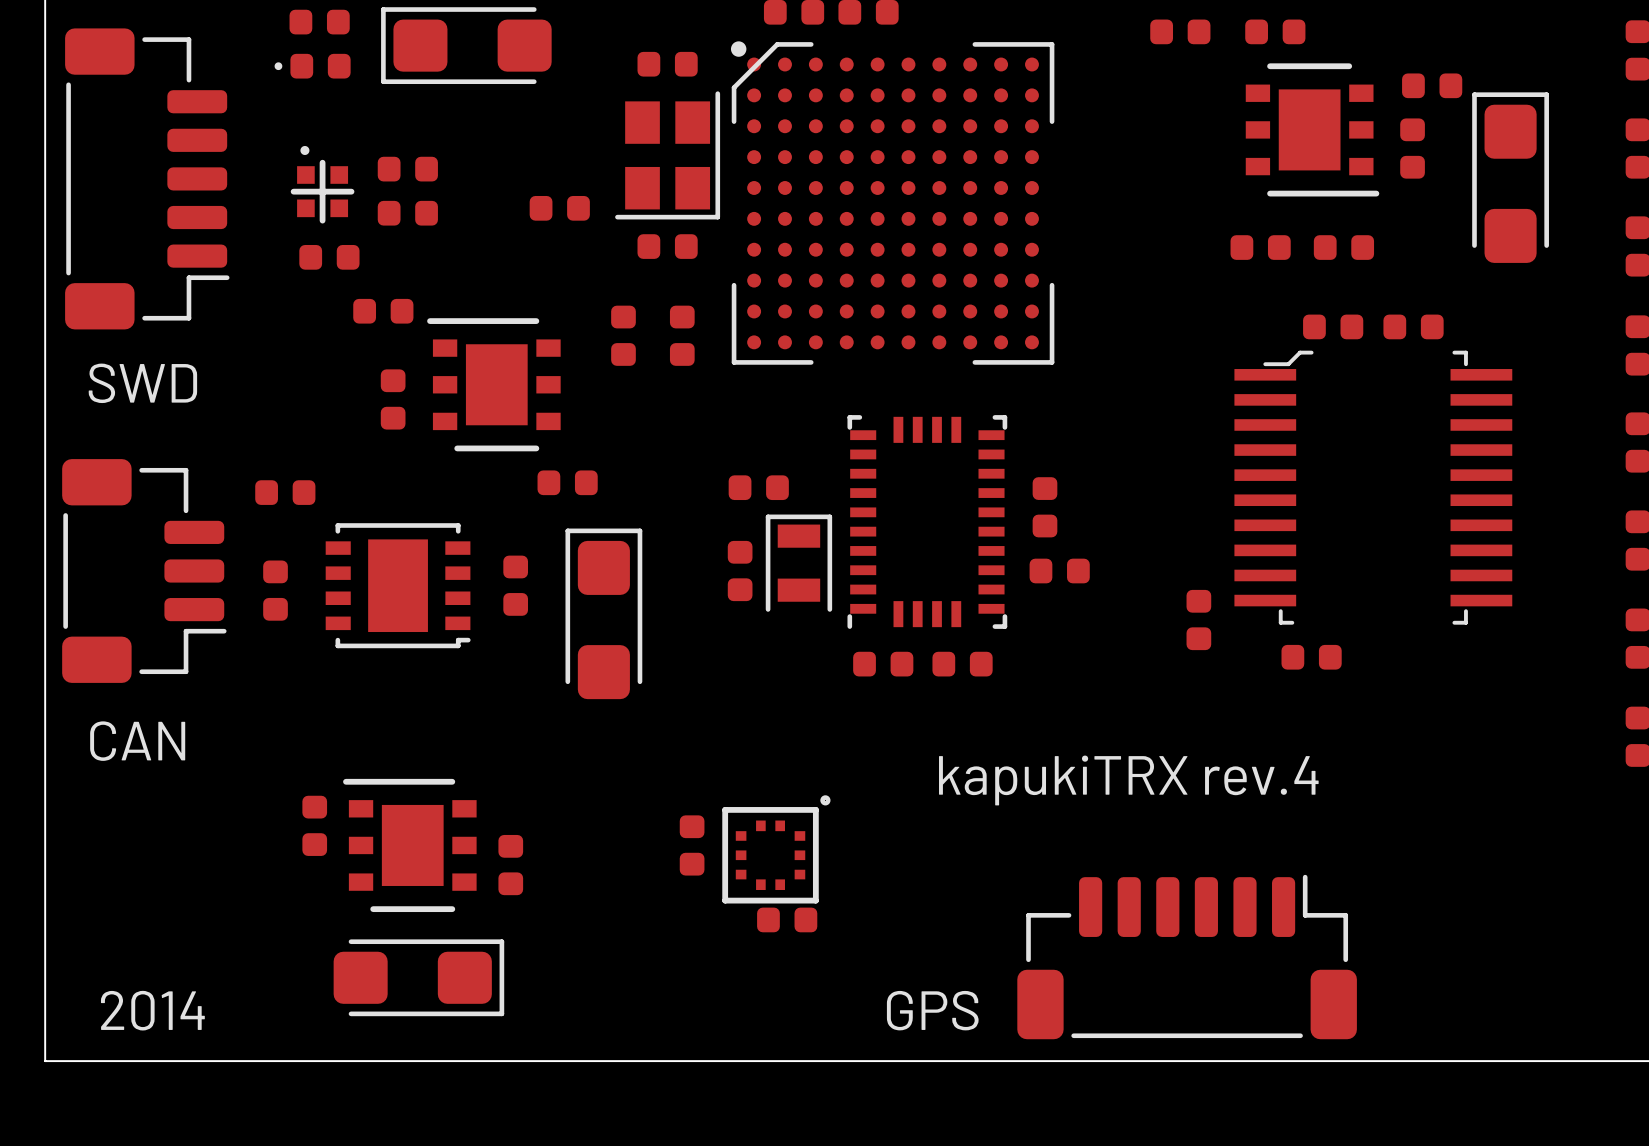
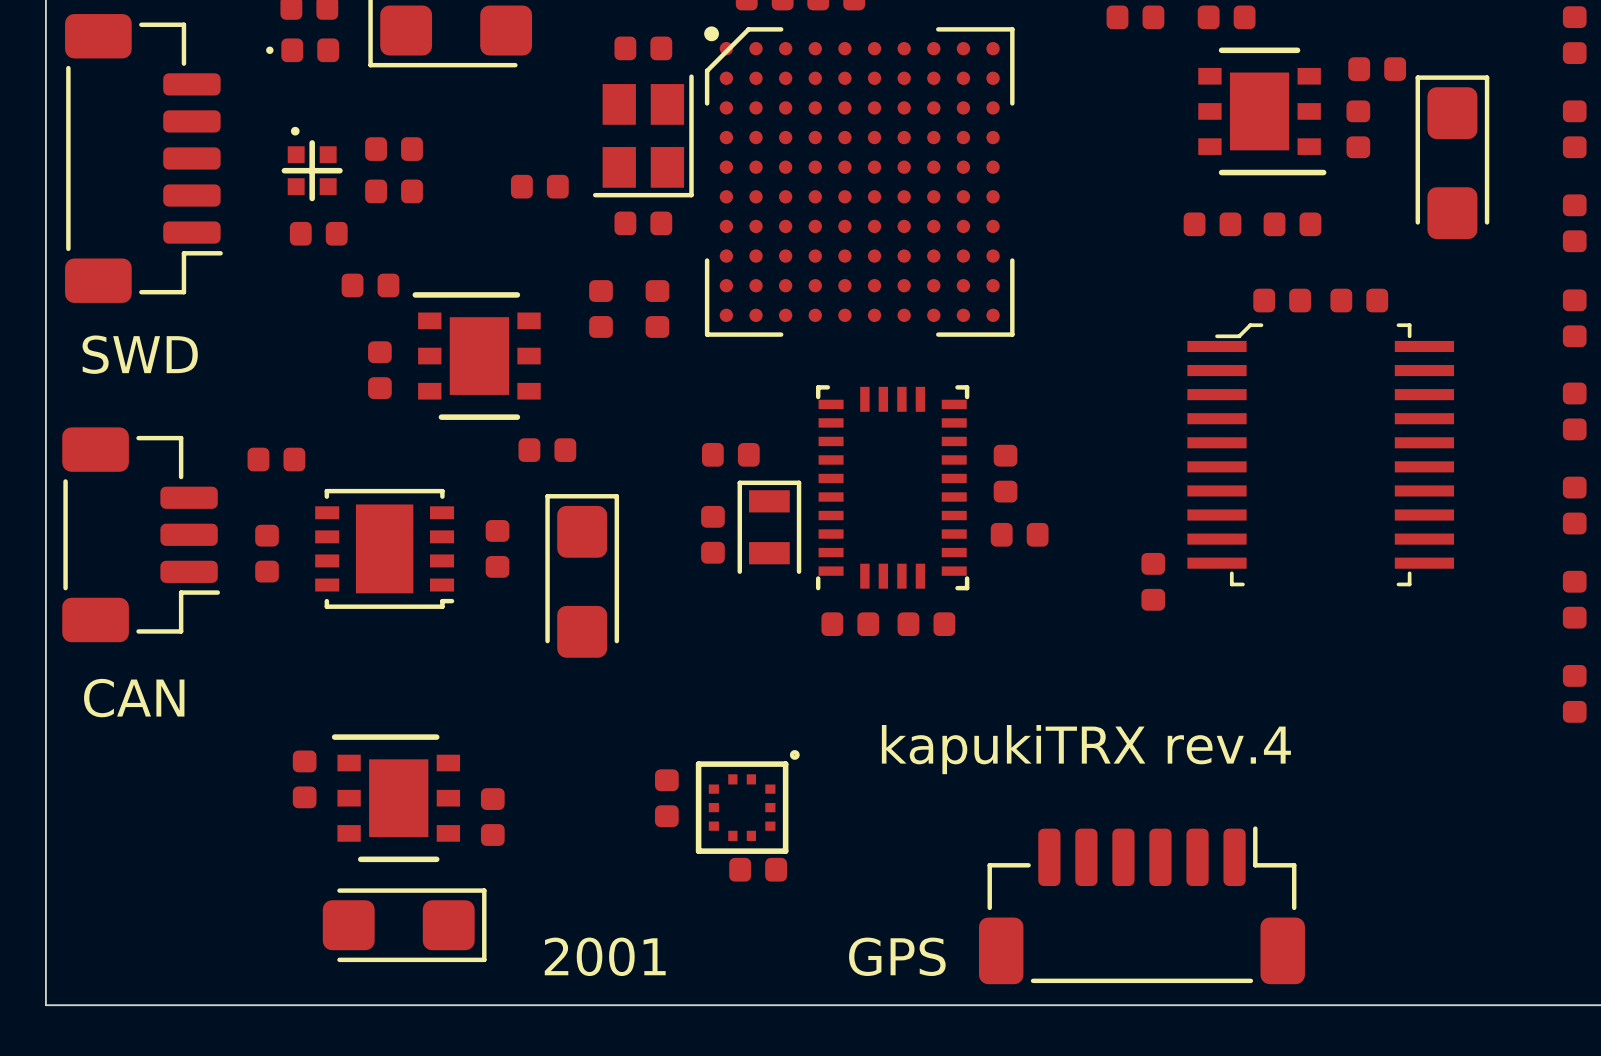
part: (1311, 657) -> none
text position: kapukiTRX rev.4 (1128, 780) -> kapukiTRX rev.4 (1086, 749)
text: 2014 (152, 1010) -> none
text: none -> 2001 (605, 956)

